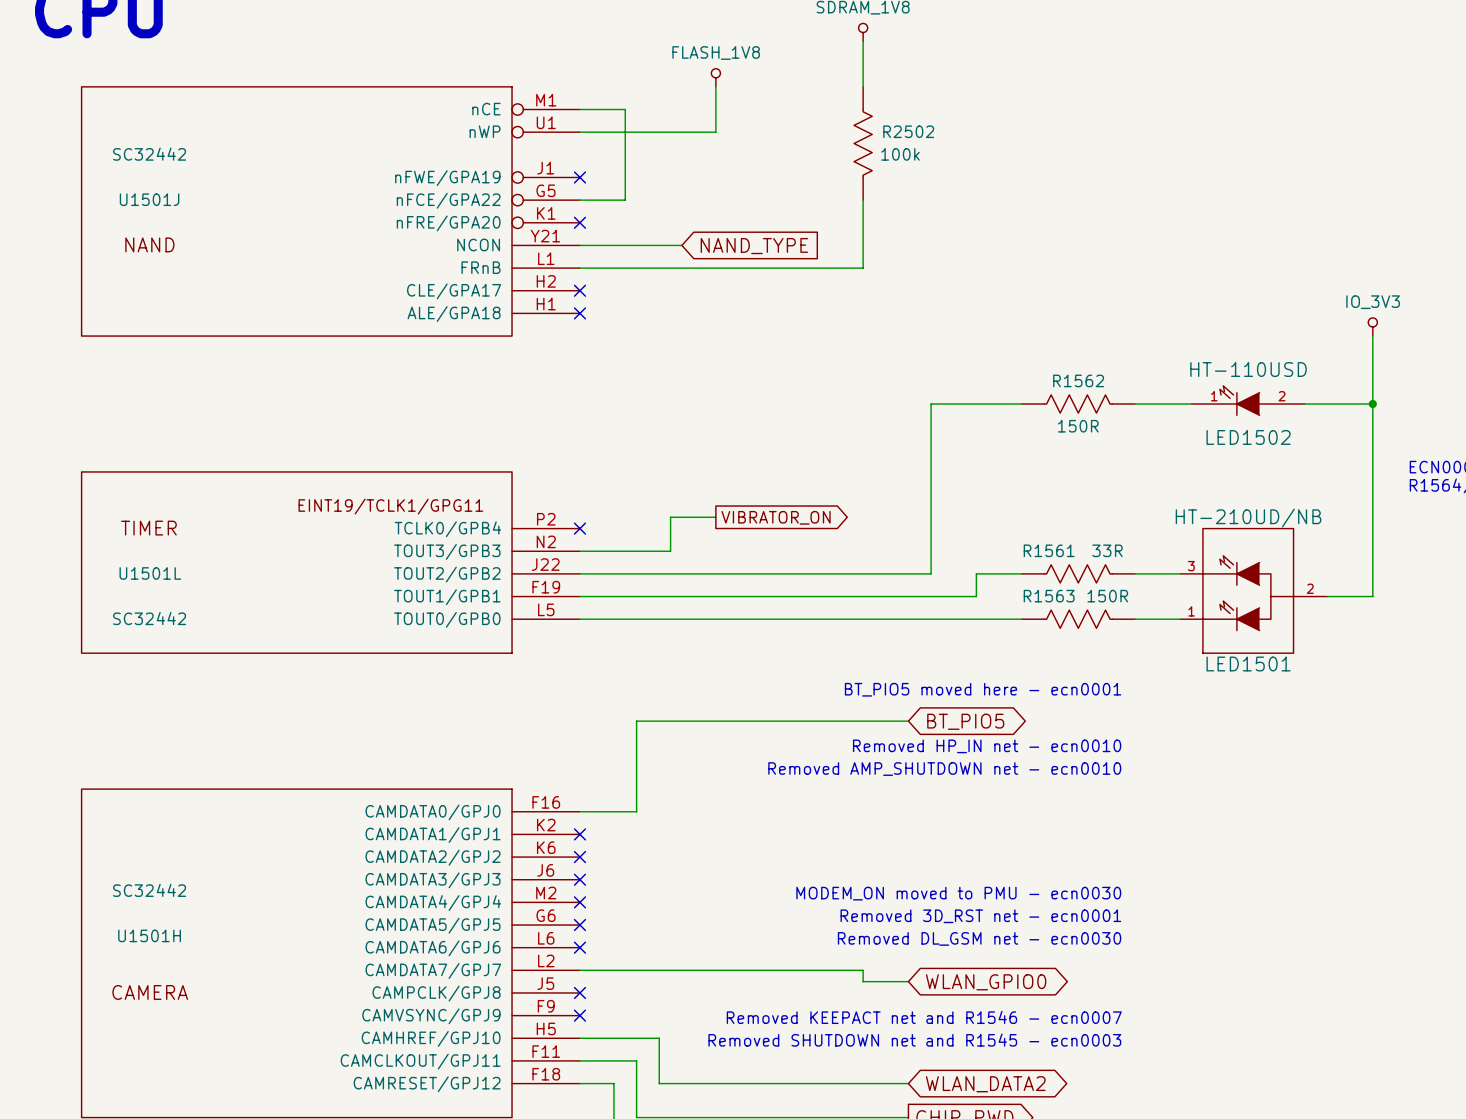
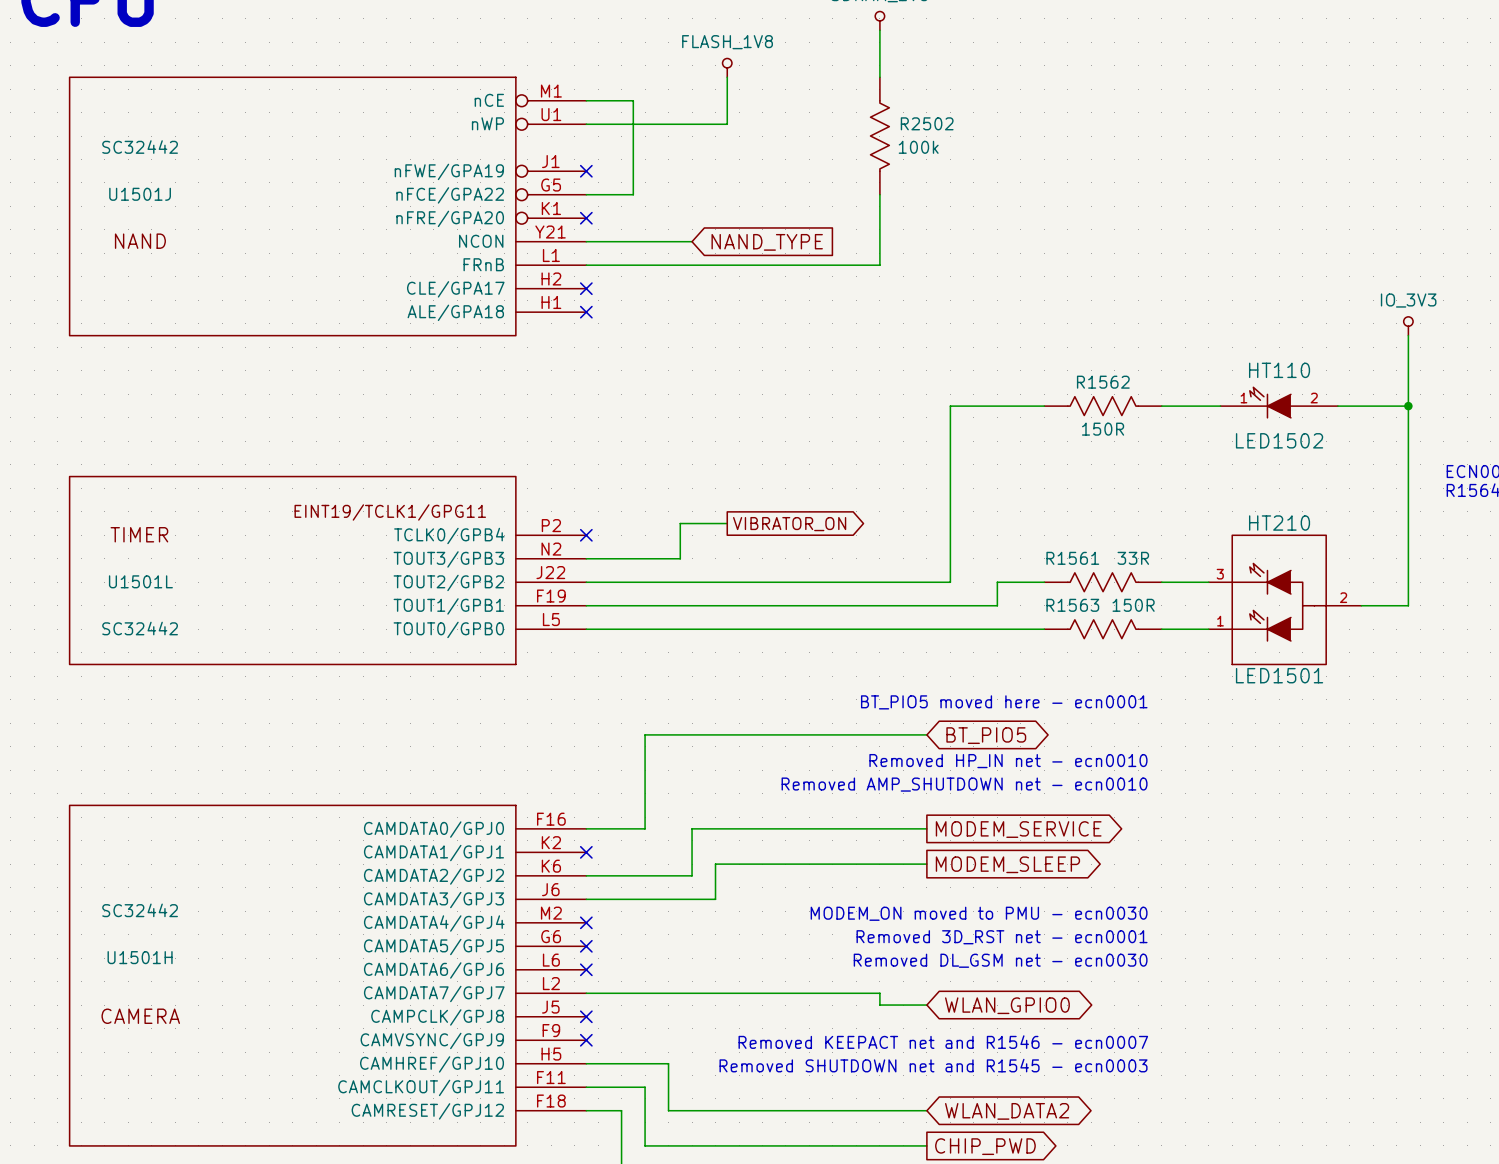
LED1502 value: HT-110USD (1248, 369) -> HT110 (1279, 370)
LED1501 value: HT-210UD/NB (1248, 518) -> HT210 (1279, 523)
wire: none -> (926, 828) (692, 828) (692, 875) (586, 875)
global label: none -> MODEM_SERVICE (1018, 829)
wire: none -> (926, 864) (715, 864) (715, 899) (586, 899)
global label: none -> MODEM_SLEEP (1007, 864)
no-connect mark: (579, 857) -> none
no-connect mark: (579, 879) -> none

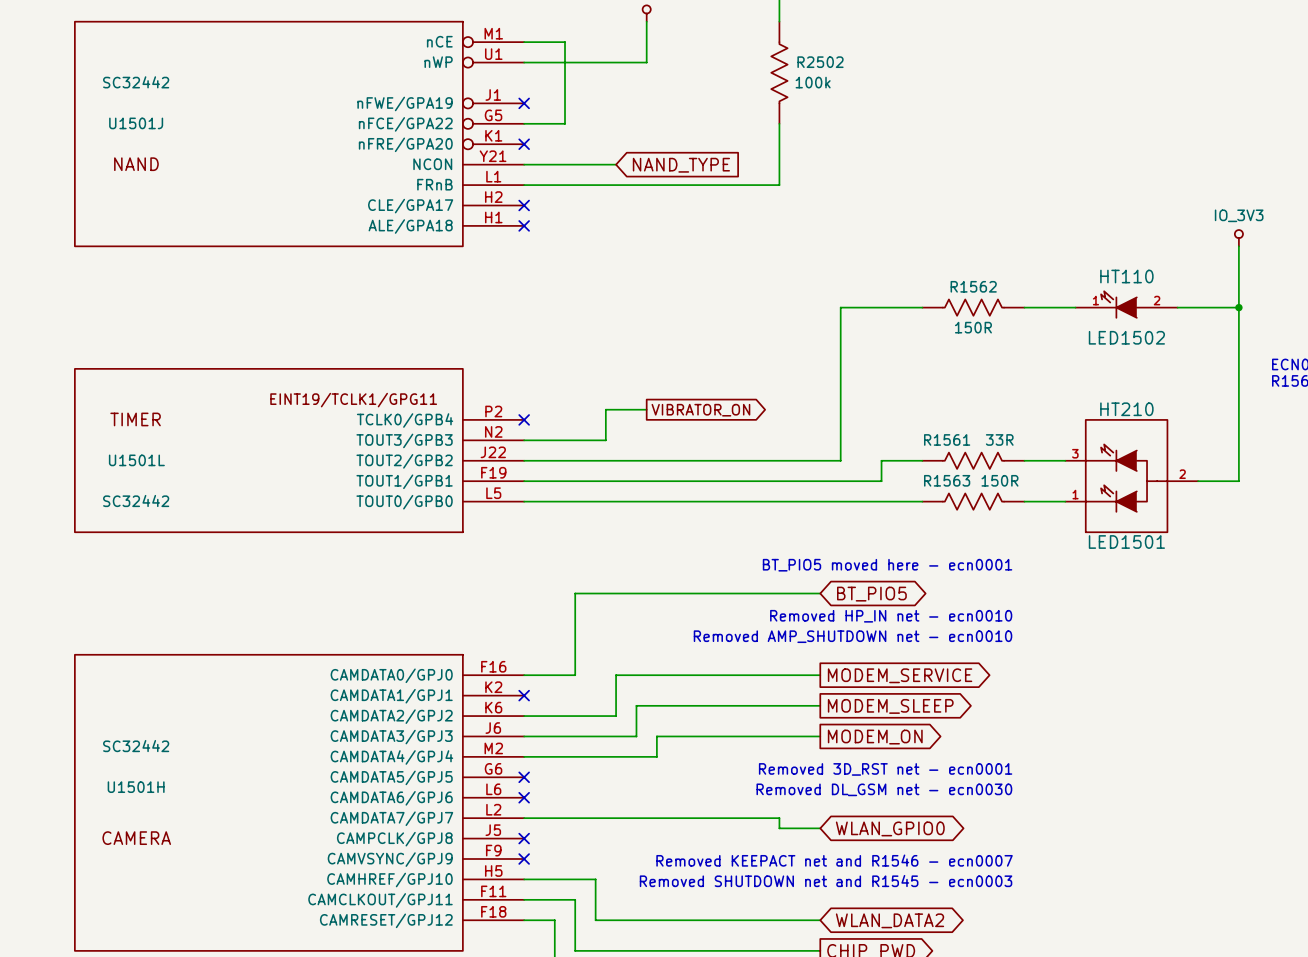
wire: none -> (820, 736) (656, 736) (656, 756) (524, 756)
global label: none -> MODEM_ON (875, 737)
text: MODEM_ON moved to PMU - ecn0030 (979, 913) -> none
no-connect mark: (586, 922) -> none

